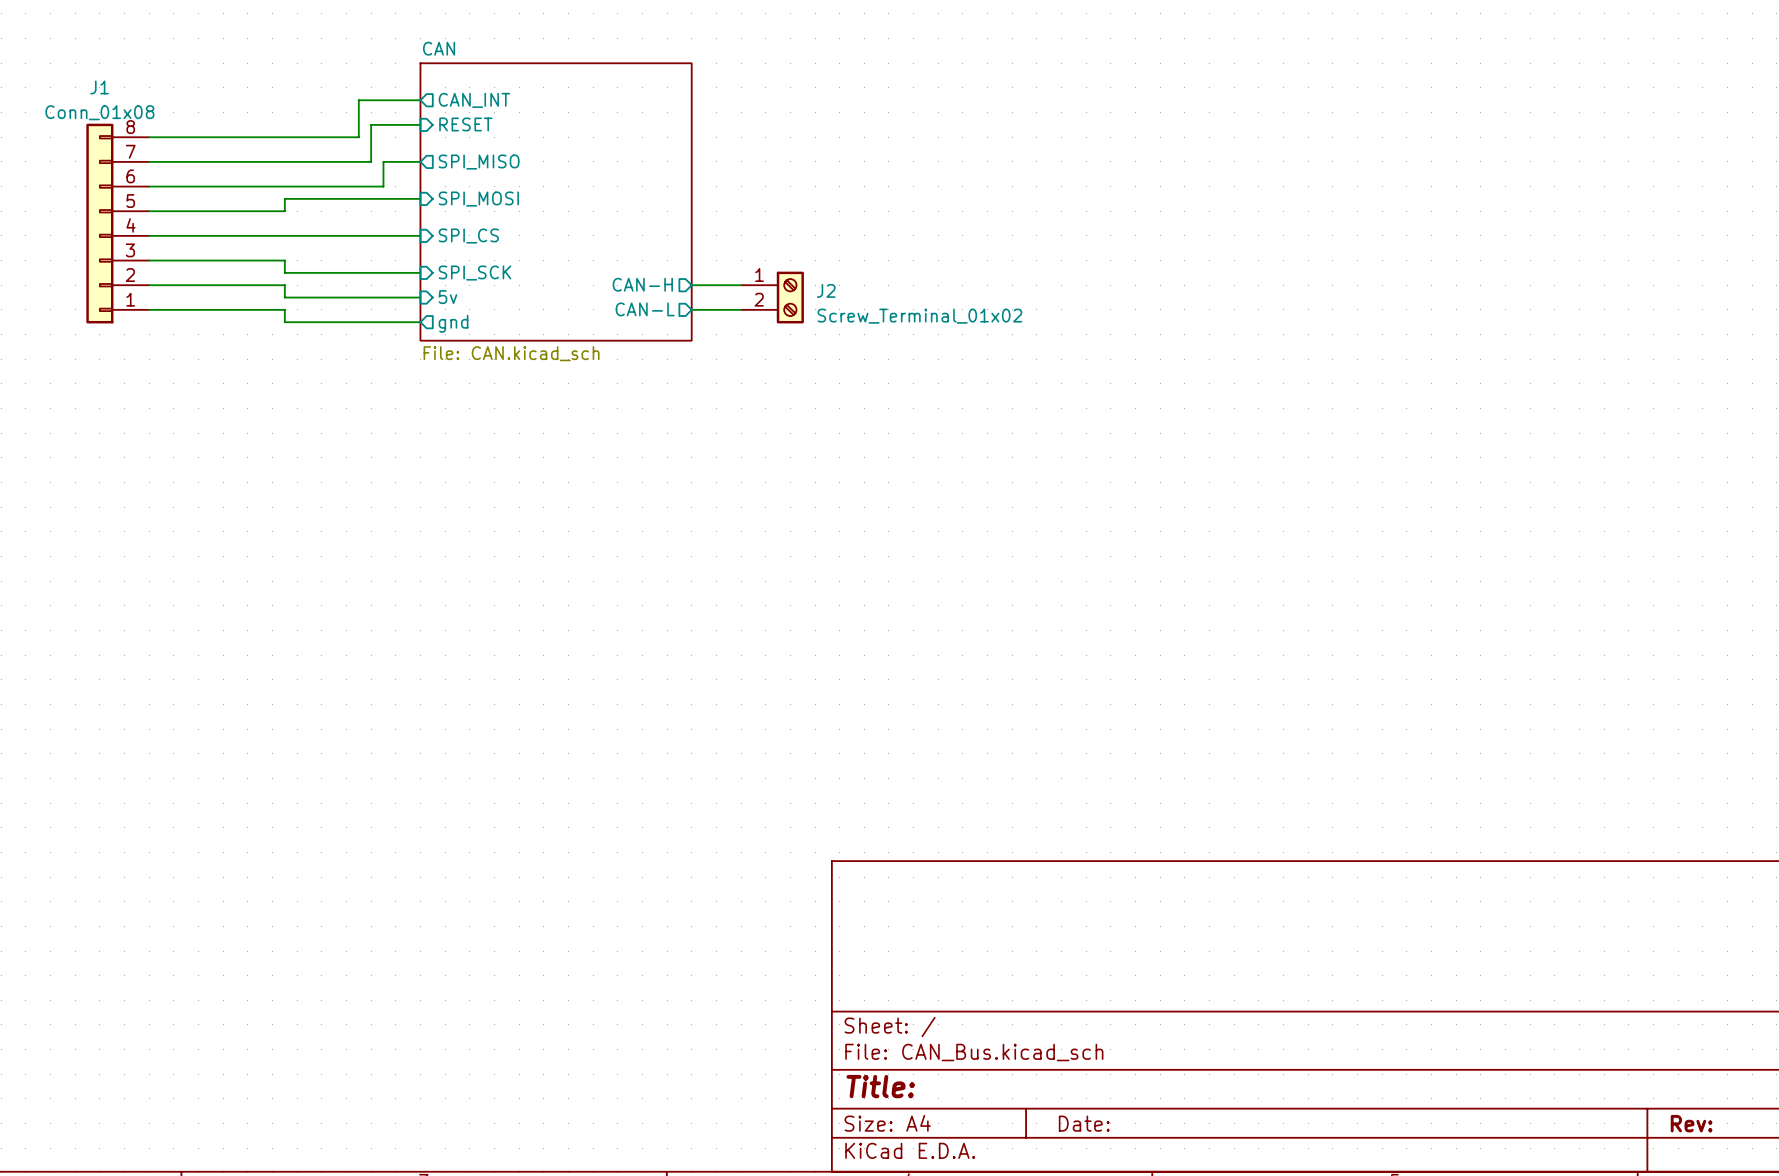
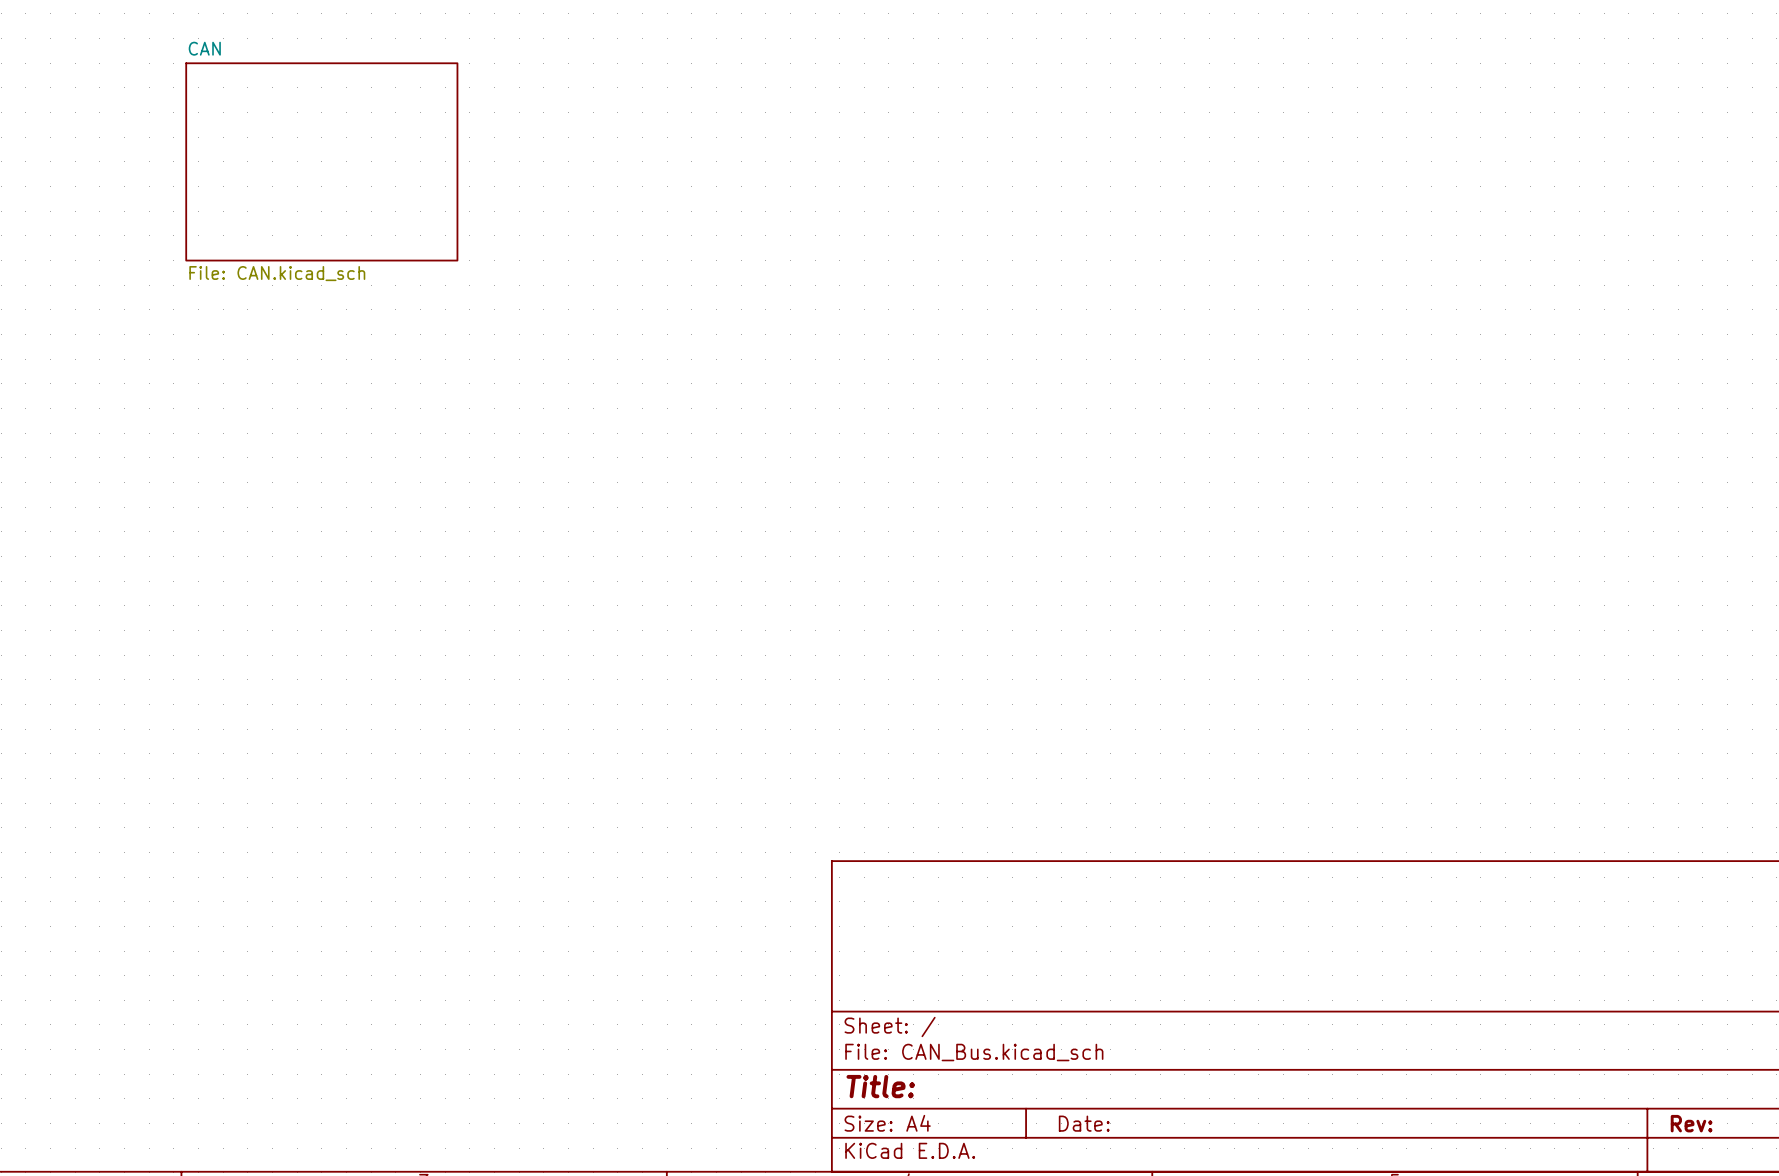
wire: (420, 100) (358, 100) (358, 137) (149, 137) -> none
sheet pin: CAN_INT (474, 100) -> none
wire: (420, 124) (371, 124) (371, 161) (149, 161) -> none
sheet pin: RESET (465, 124) -> none
sheet CAN: none -> File: CAN.kicad_sch (321, 161)
wire: (420, 161) (383, 161) (383, 186) (149, 186) -> none
sheet pin: SPI_MISO (479, 162) -> none
wire: (420, 198) (284, 198) (284, 211) (149, 211) -> none
sheet pin: SPI_MOSI (478, 199) -> none
sheet CAN: File: CAN.kicad_sch (556, 201) -> none
J1: Conn_01x08 (117, 223) -> none
wire: (149, 235) (420, 235) -> none
sheet pin: SPI_CS (468, 236) -> none
wire: (149, 260) (284, 260) (284, 272) (420, 272) -> none
sheet pin: SPI_SCK (474, 273) -> none
sheet pin: CAN-H (642, 284) -> none
wire: (149, 285) (284, 285) (284, 297) (420, 297) -> none
wire: (691, 285) (741, 285) -> none
sheet pin: 5v (447, 297) -> none
J2: Screw_Terminal_01x02 (772, 297) -> none
wire: (149, 309) (284, 309) (284, 322) (420, 322) -> none
sheet pin: CAN-L (645, 309) -> none
wire: (691, 309) (741, 309) -> none
sheet pin: gnd (453, 323) -> none

